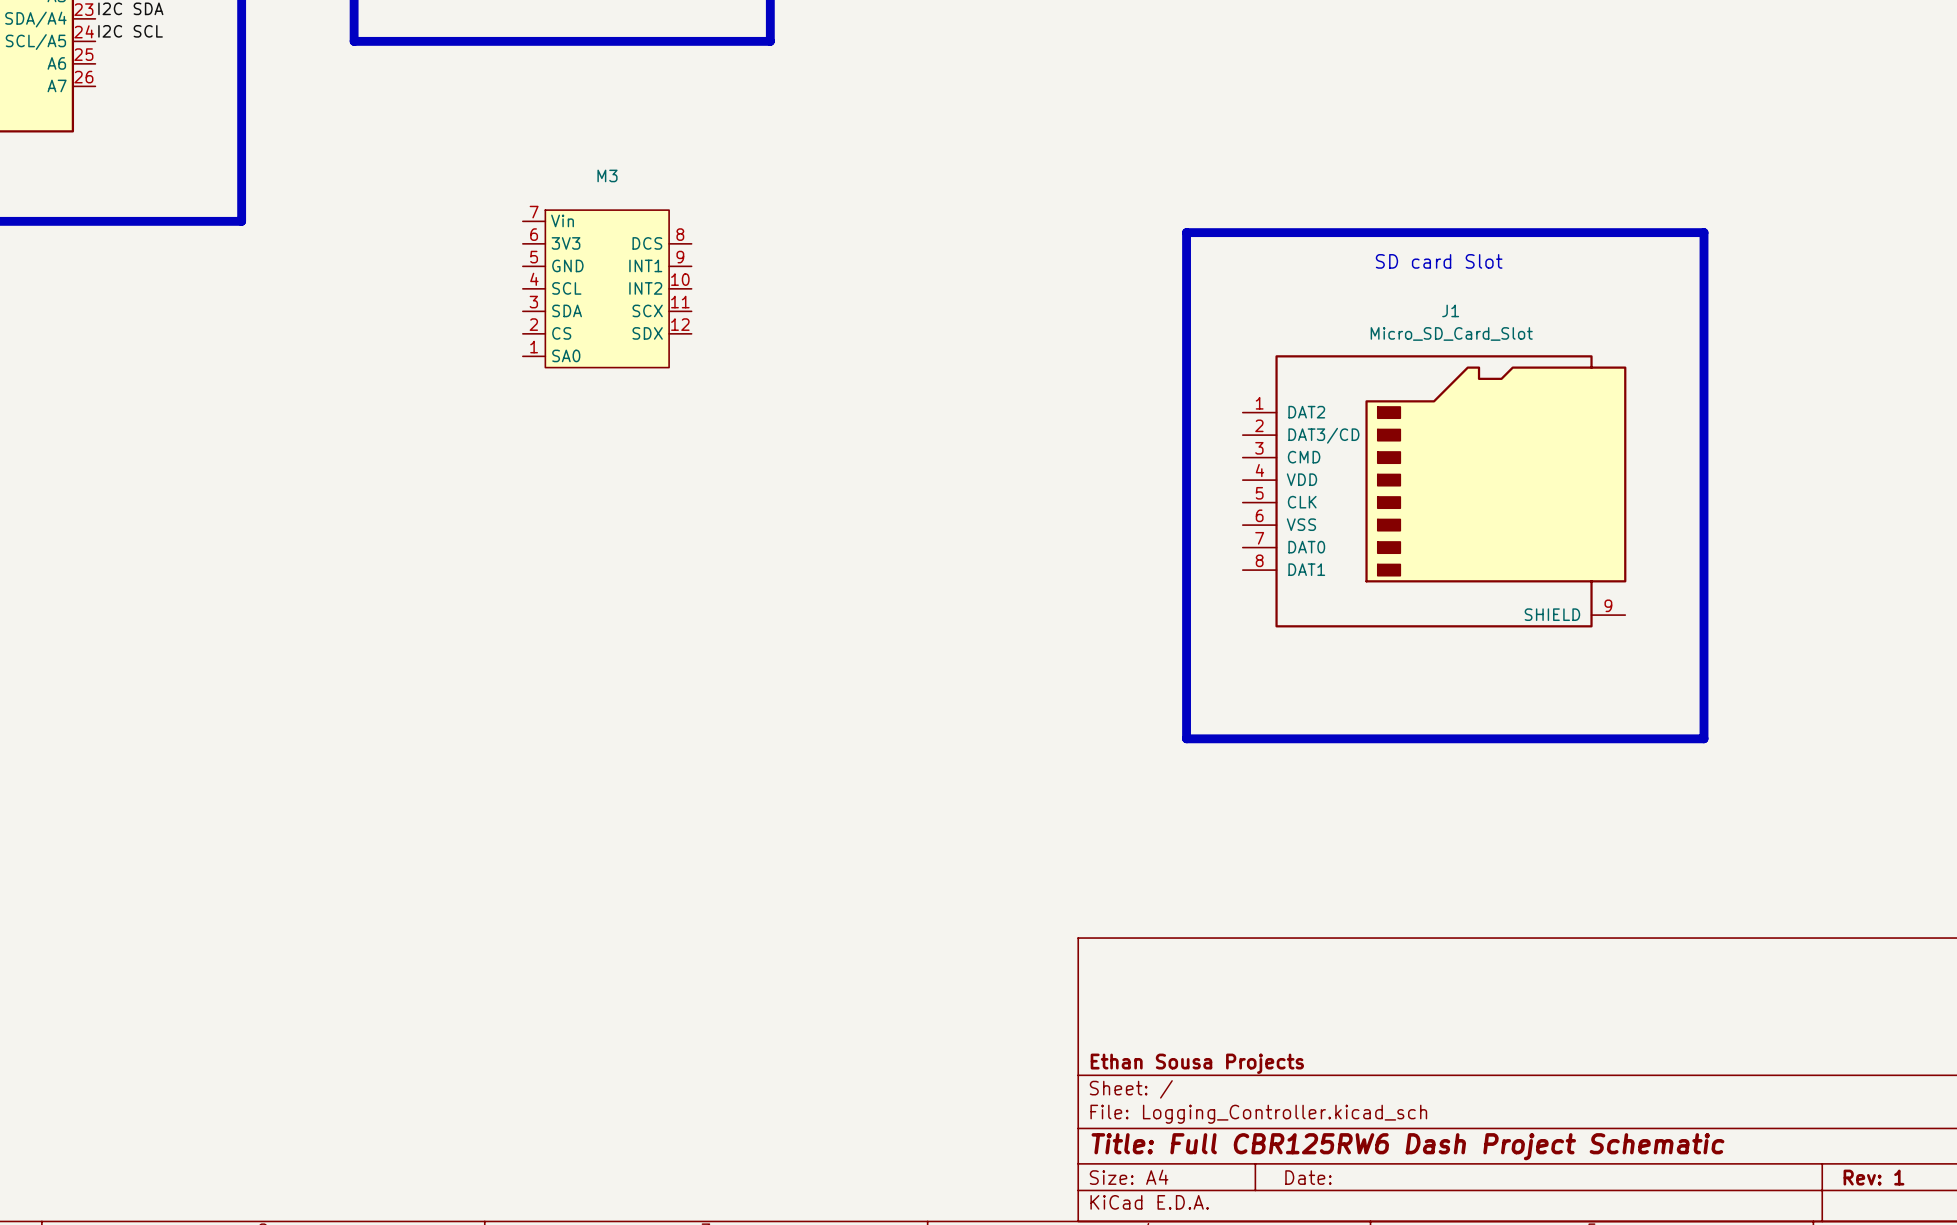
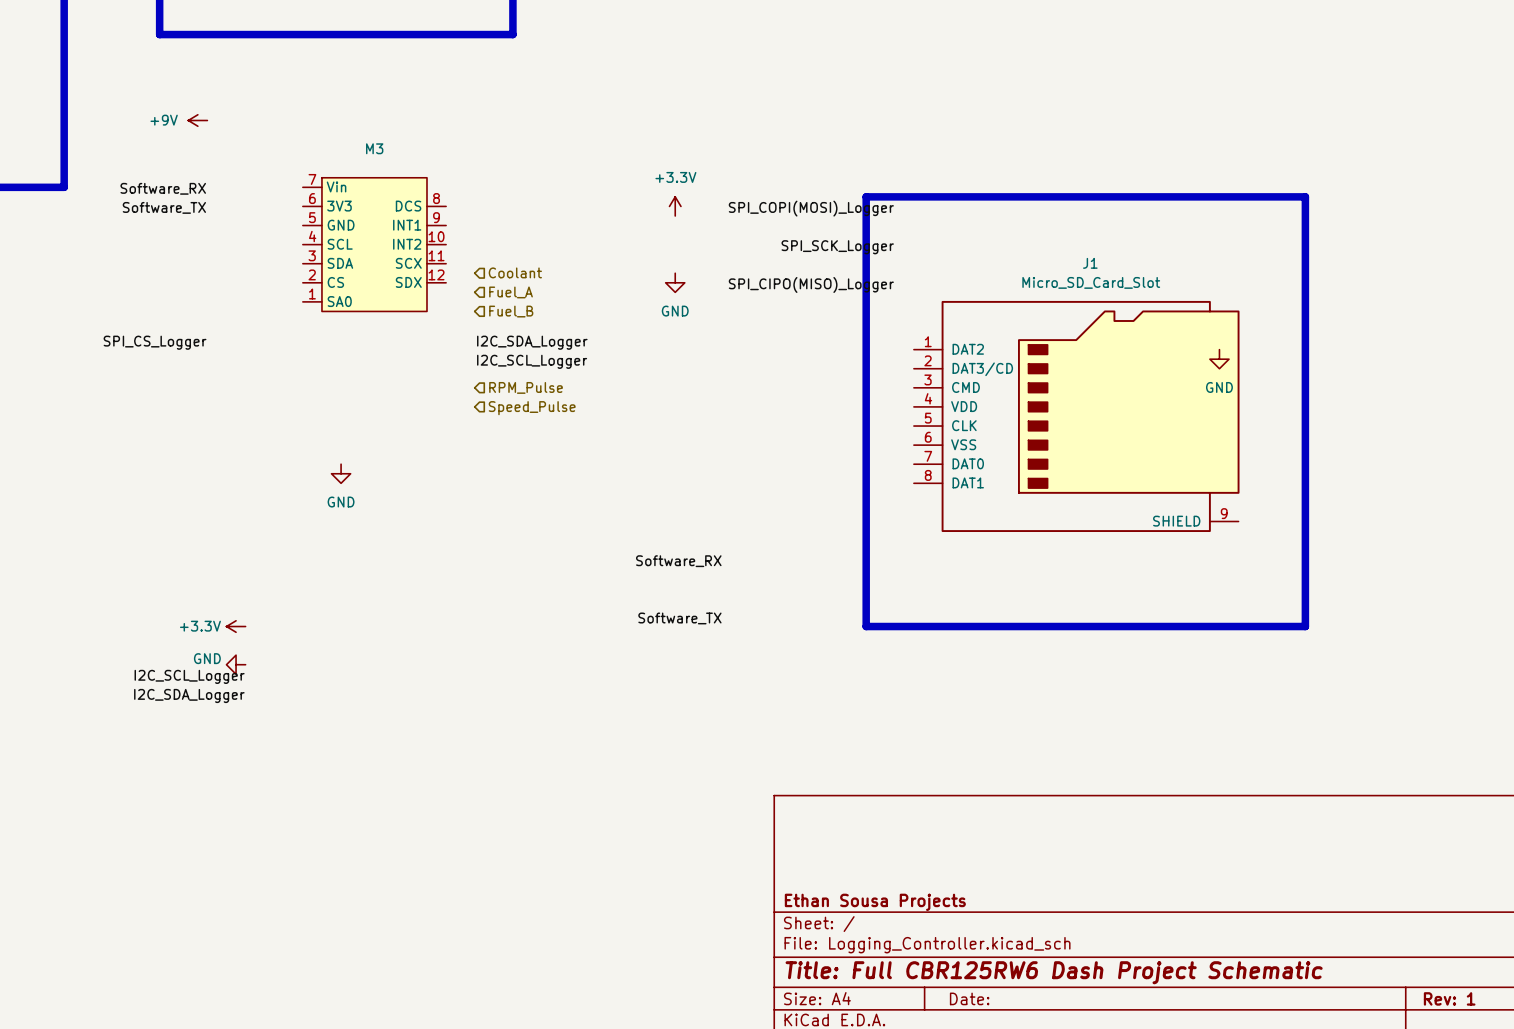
power symbol: none -> +9V (197, 120)
label: none -> Software_RX (163, 188)
power symbol: none -> +3.3V (675, 206)
label: none -> Software_TX (164, 207)
label: none -> SPI_COPI(MOSI)_Logger (811, 208)
text: SD card Slot (1439, 261) -> none
label: none -> SPI_SCK_Logger (837, 247)
hierarchical label: none -> Coolant (515, 272)
power symbol: none -> GND (675, 282)
label: none -> SPI_CIPO(MISO)_Logger (811, 284)
hierarchical label: none -> Fuel_A (511, 292)
hierarchical label: none -> Fuel_B (511, 311)
label: none -> SPI_CS_Logger (155, 342)
label: none -> I2C_SDA_Logger (532, 342)
power symbol: none -> GND (1219, 359)
label: none -> I2C_SCL_Logger (532, 361)
hierarchical label: none -> RPM_Pulse (526, 387)
hierarchical label: none -> Speed_Pulse (532, 408)
power symbol: none -> GND (341, 473)
label: none -> Software_RX (678, 561)
label: none -> Software_TX (679, 618)
power symbol: none -> +3.3V (236, 626)
power symbol: none -> GND (236, 664)
label: none -> I2C_SCL_Logger (189, 676)
label: none -> I2C_SDA_Logger (189, 695)

